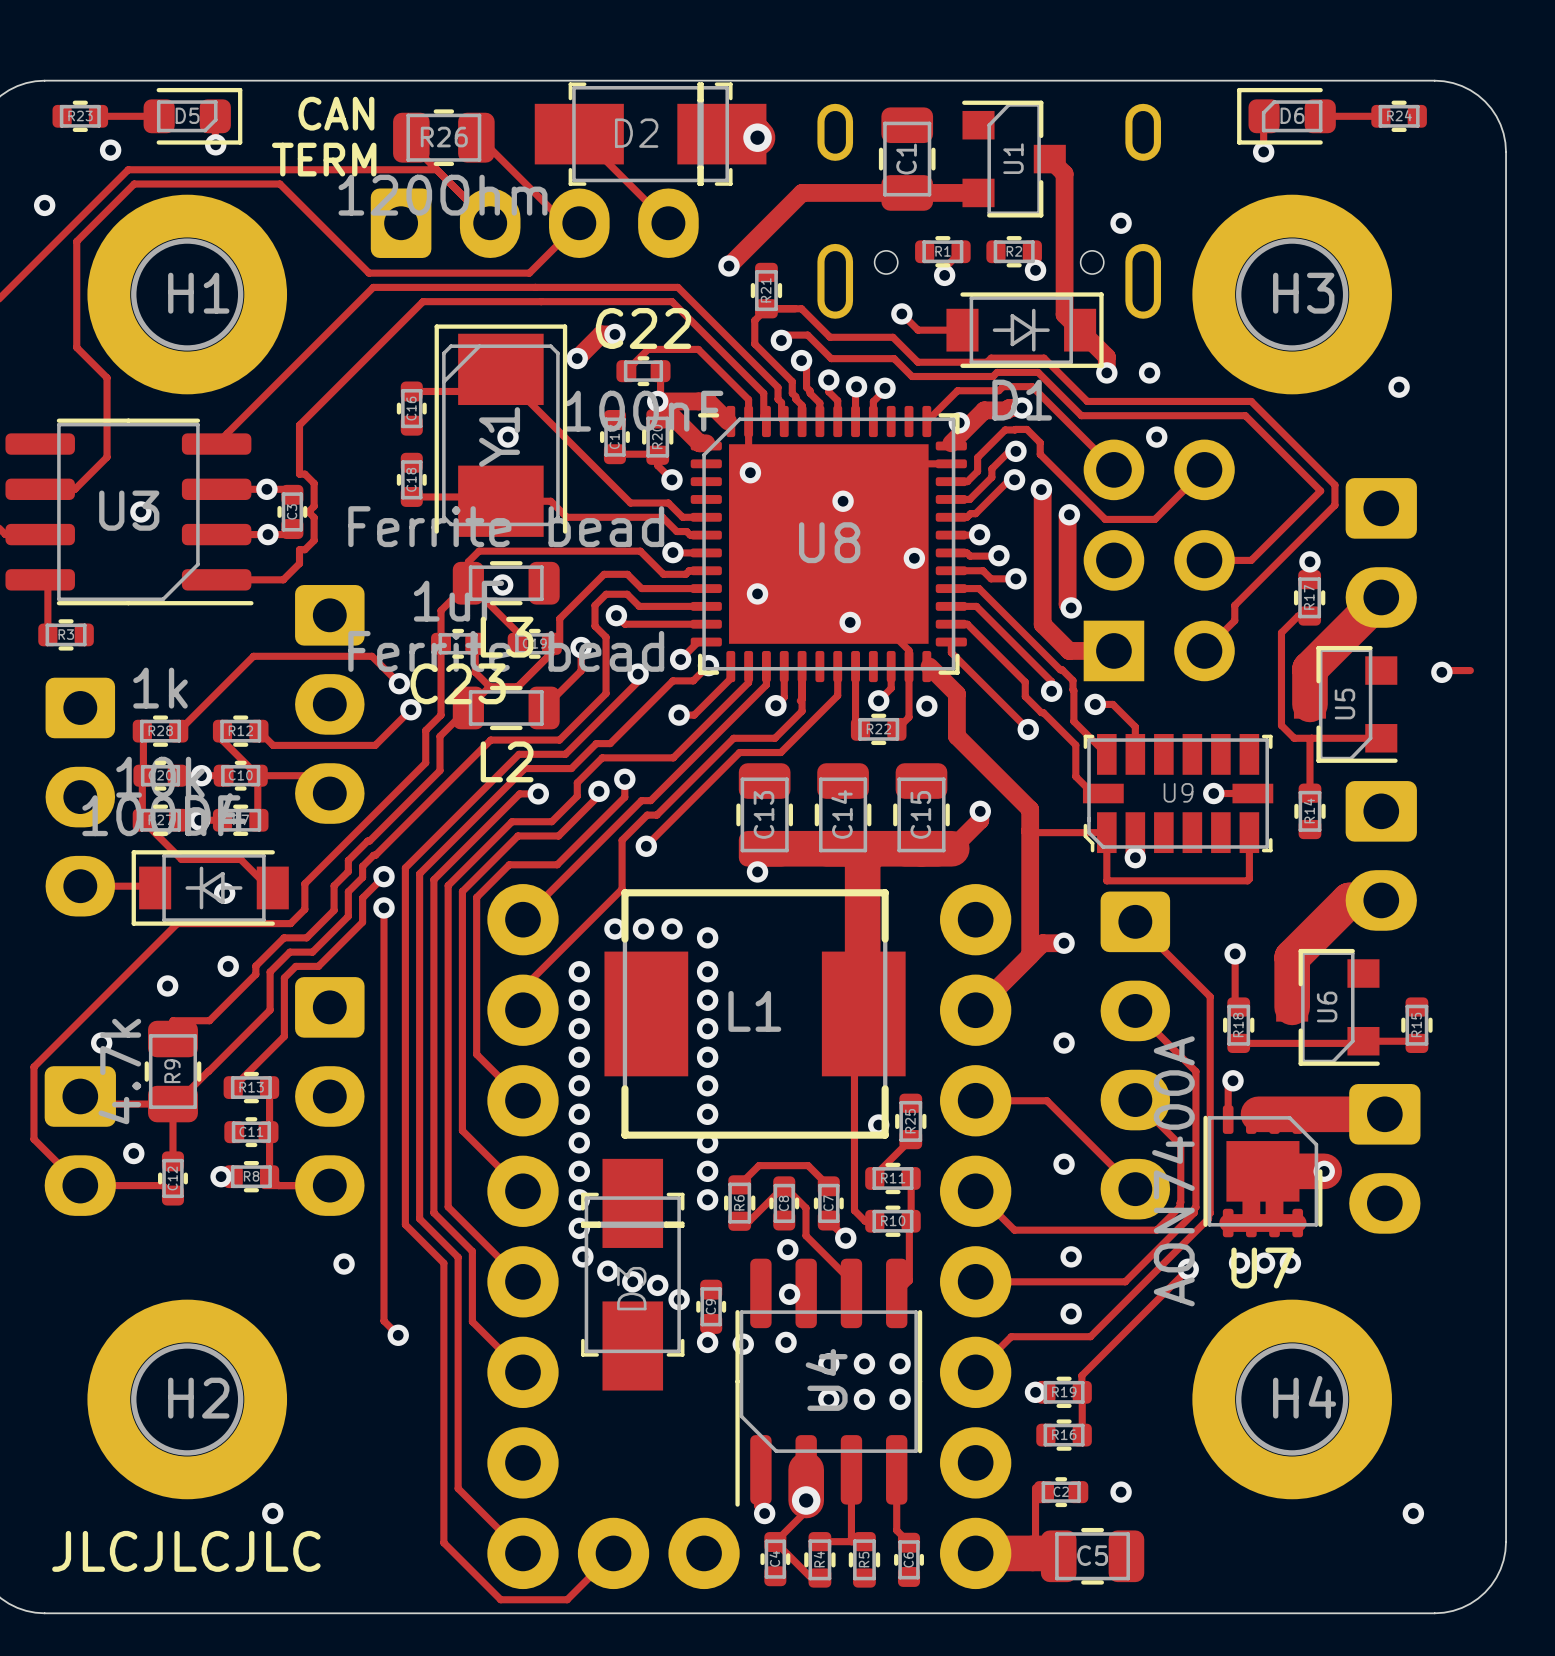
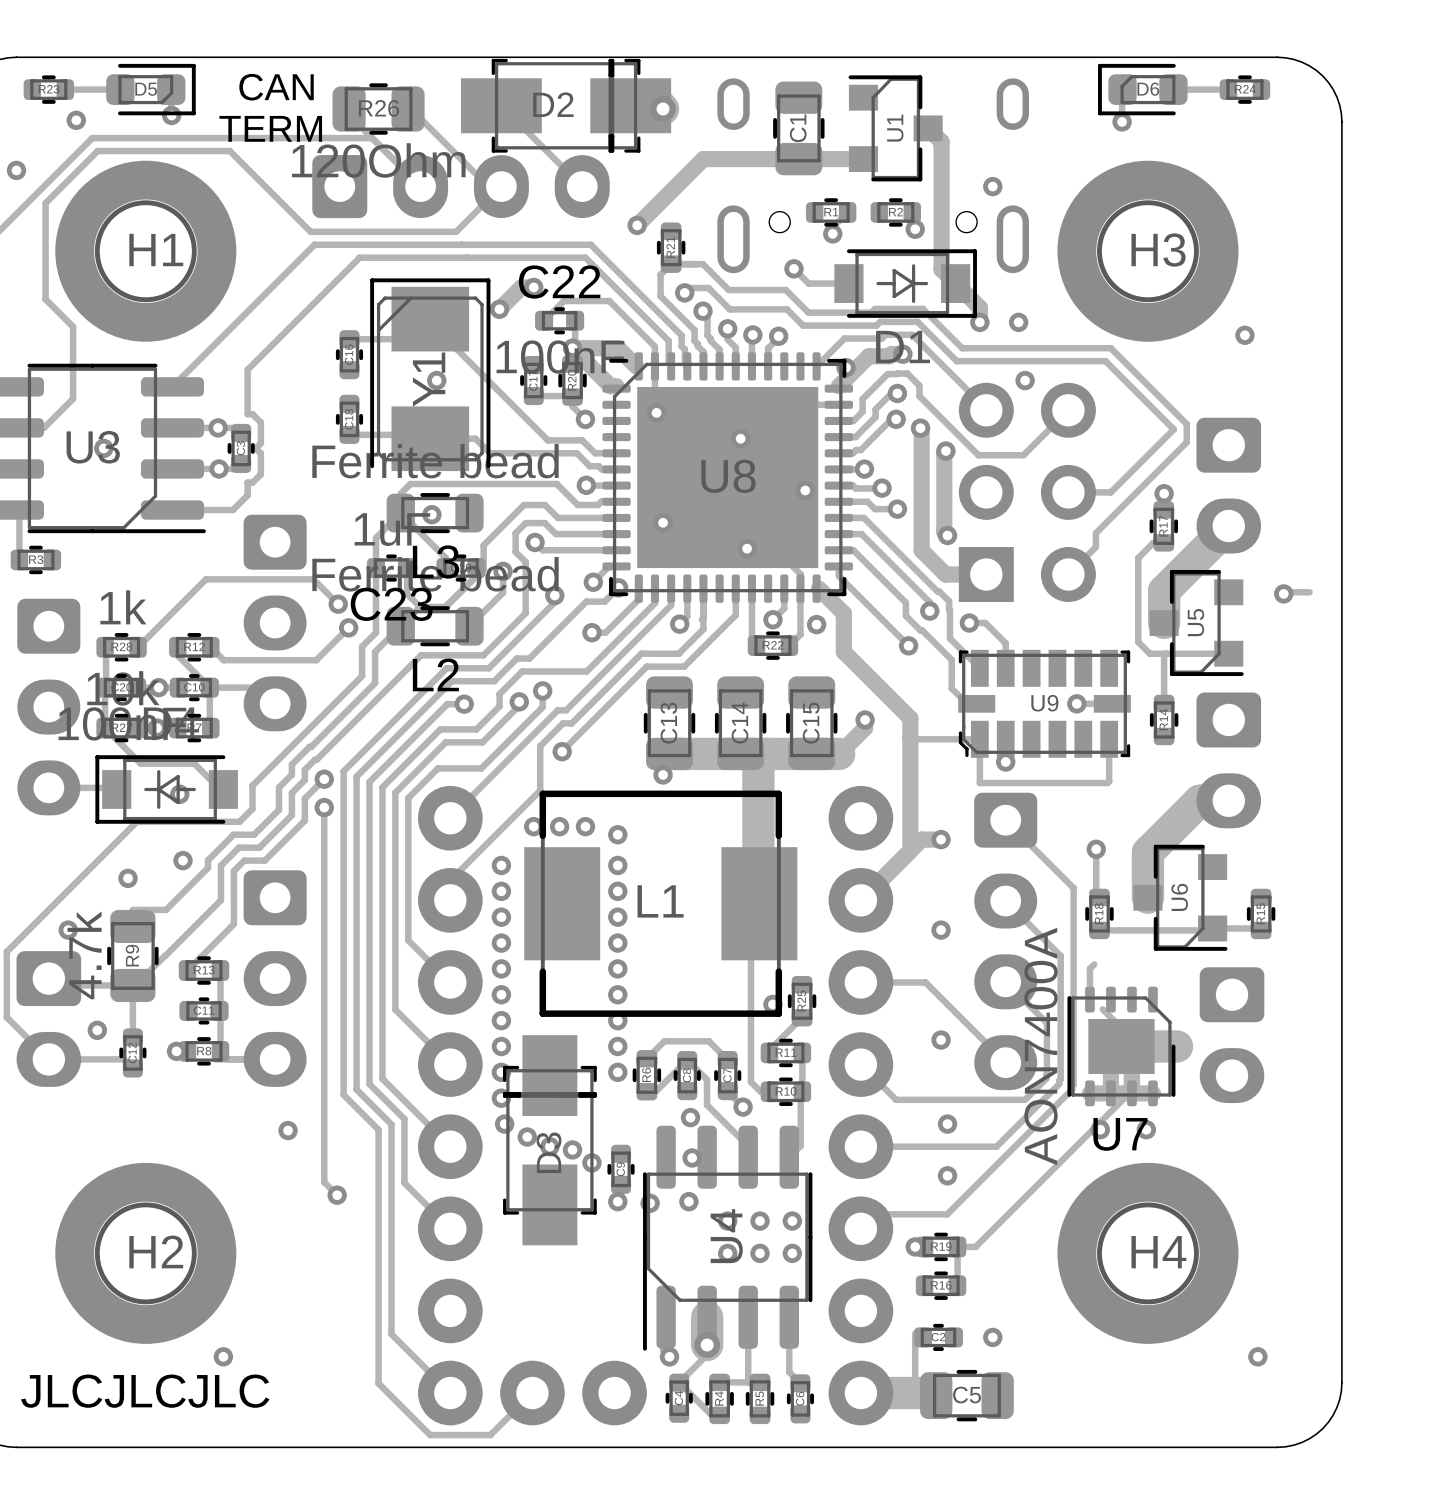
via: (1233, 1080) -> none
track: (1258, 1114) (1384, 1114) -> none
via: (1324, 1171) -> none
via: (1264, 1263) -> none
track: (1188, 1269) (1081, 1375) (1081, 1391) -> (1102, 1009) (1126, 1033) (1126, 1095) (975, 1246) (957, 1246)
via: (1188, 1269) -> none
track: (1090, 1336) (1011, 1336) (991, 1356) -> (965, 1196) (947, 1214) (875, 1214)

